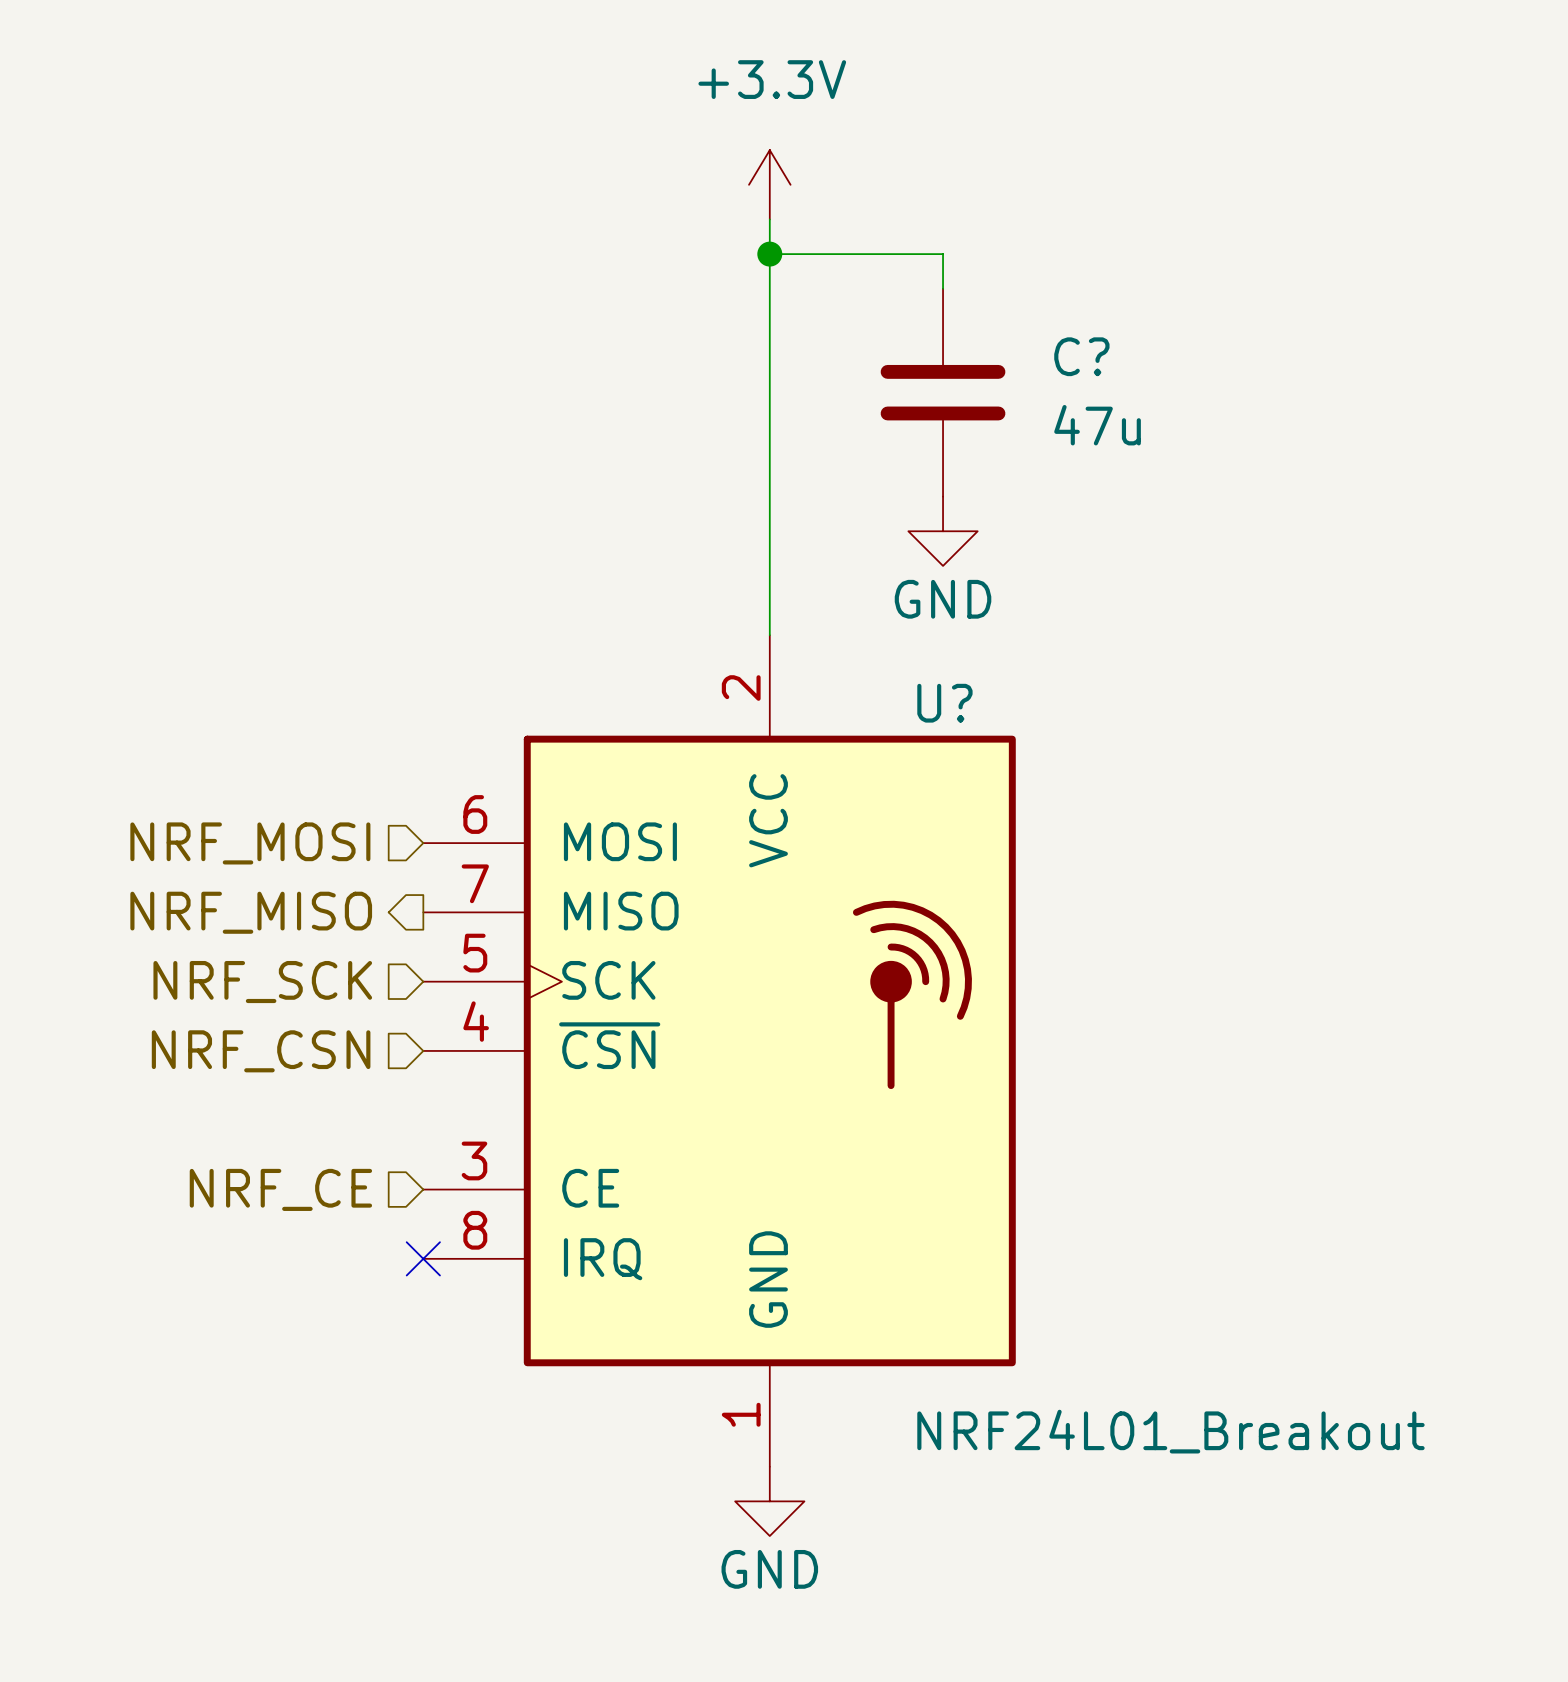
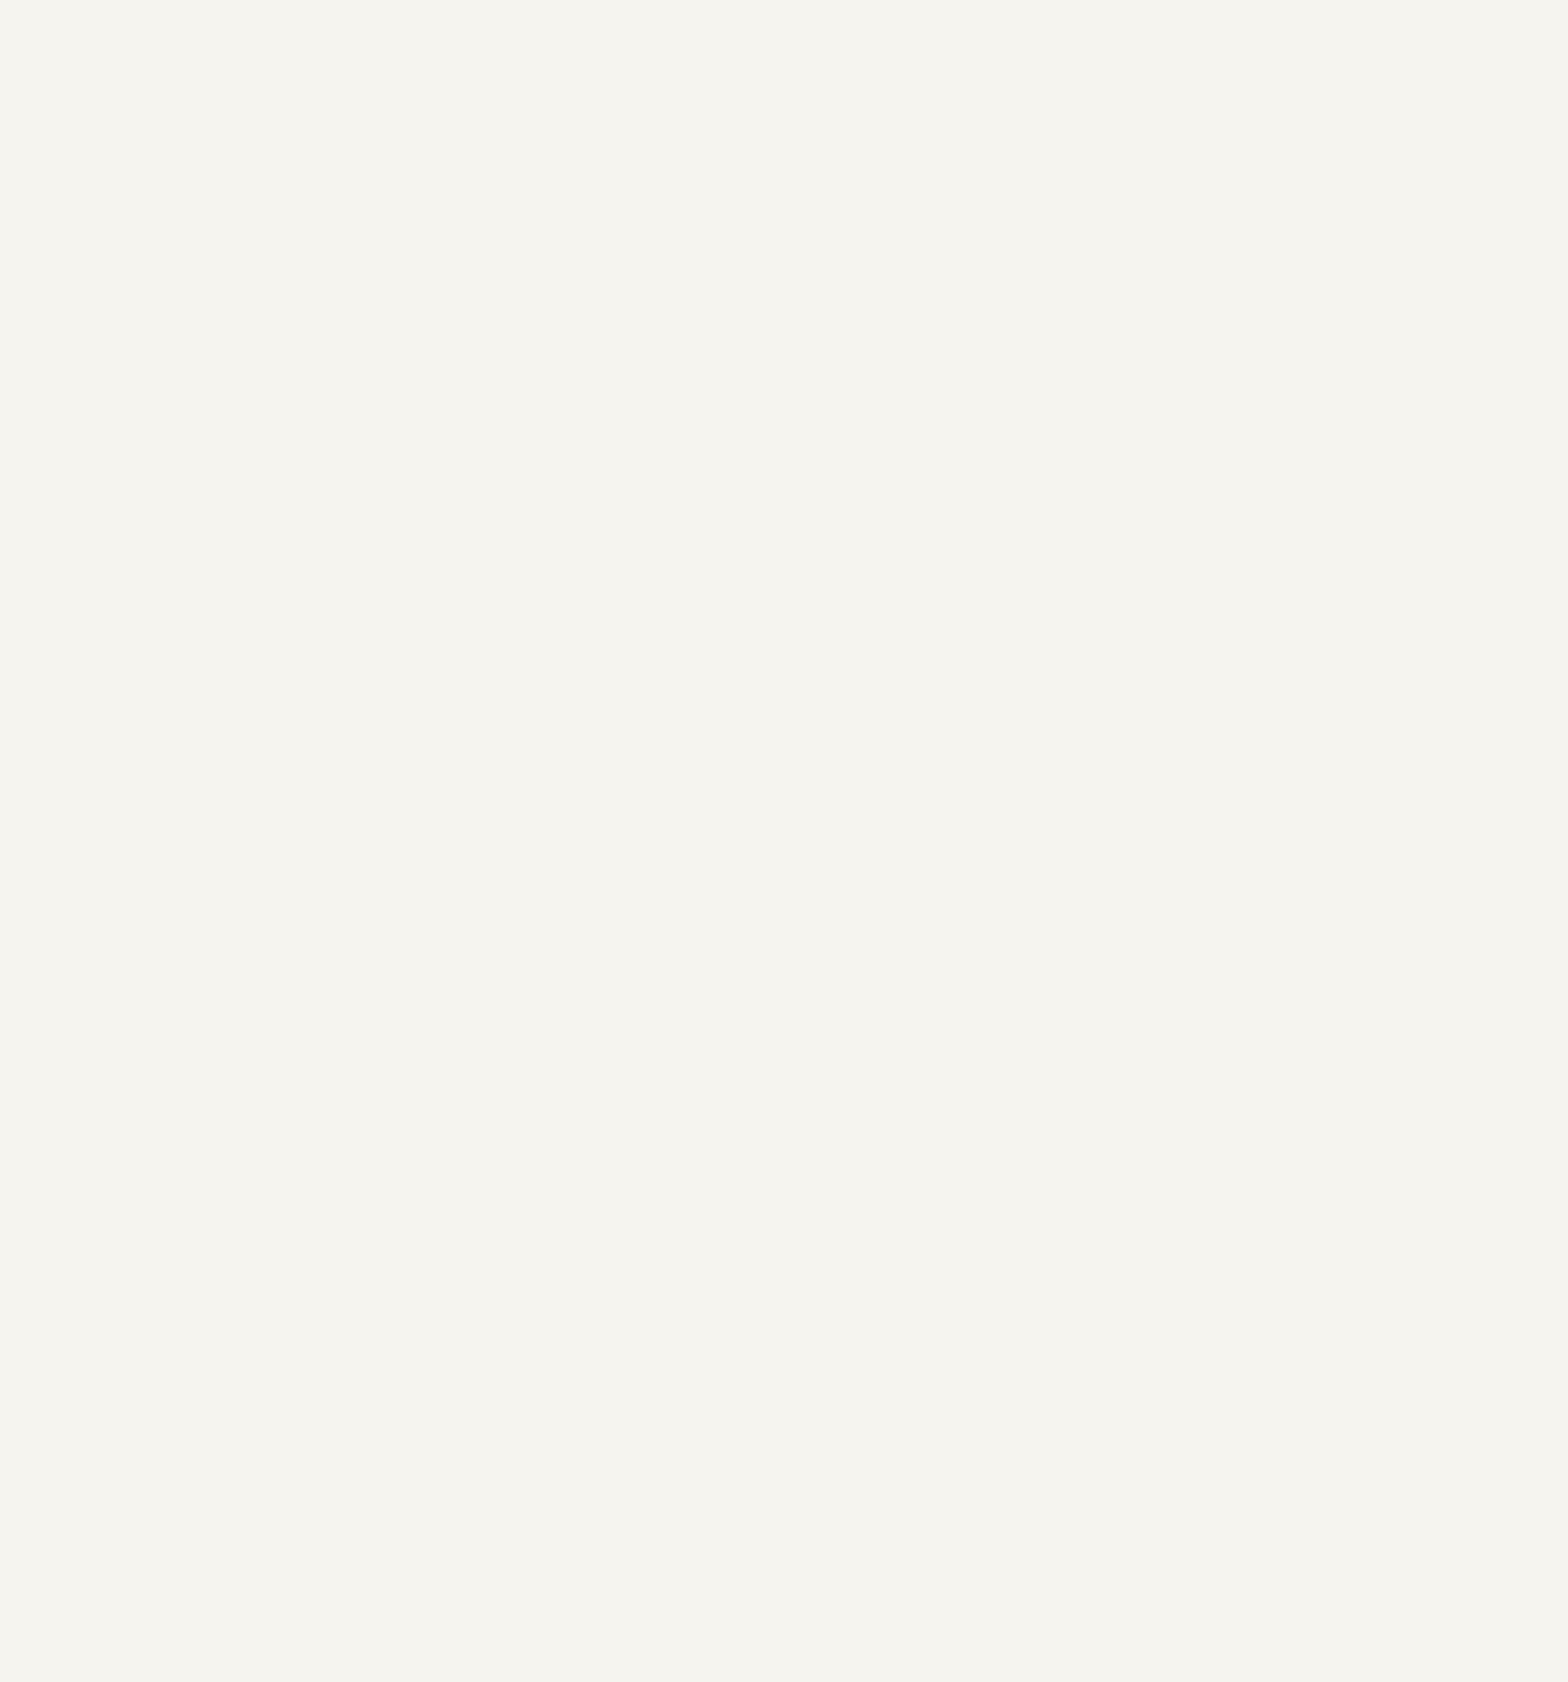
power symbol: +3.3V (769, 184) -> none
wire: (769, 219) (769, 635) -> none
wire: (769, 254) (943, 254) (943, 288) -> none
junction: (769, 254) -> none
C?: 47u (943, 392) -> none
power symbol: GND (943, 531) -> none
hierarchical label: NRF_MOSI (250, 843) -> none
hierarchical label: NRF_MISO (251, 912) -> none
hierarchical label: NRF_SCK (262, 982) -> none
U?: NRF24L01_Breakout (719, 1050) -> none
hierarchical label: NRF_CSN (261, 1051) -> none
hierarchical label: NRF_CE (280, 1189) -> none
no-connect mark: (423, 1258) -> none
power symbol: GND (769, 1501) -> none

